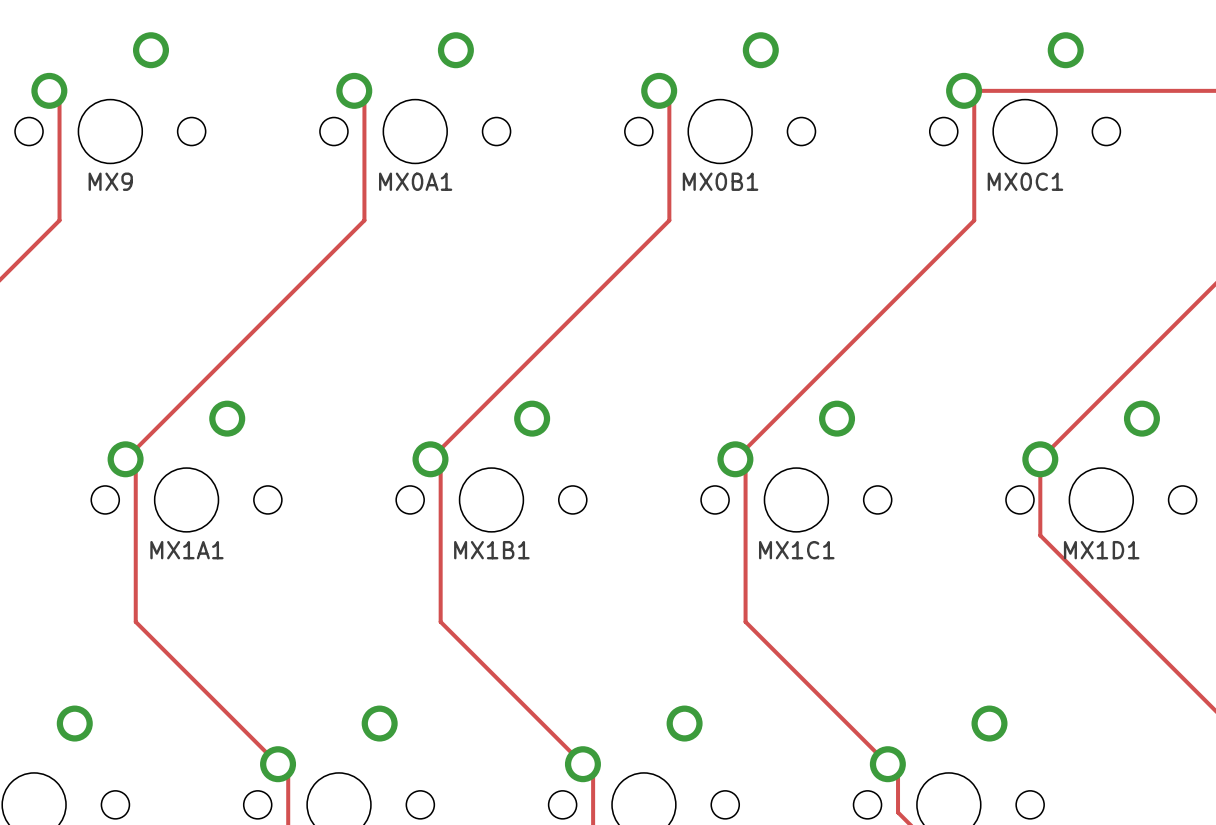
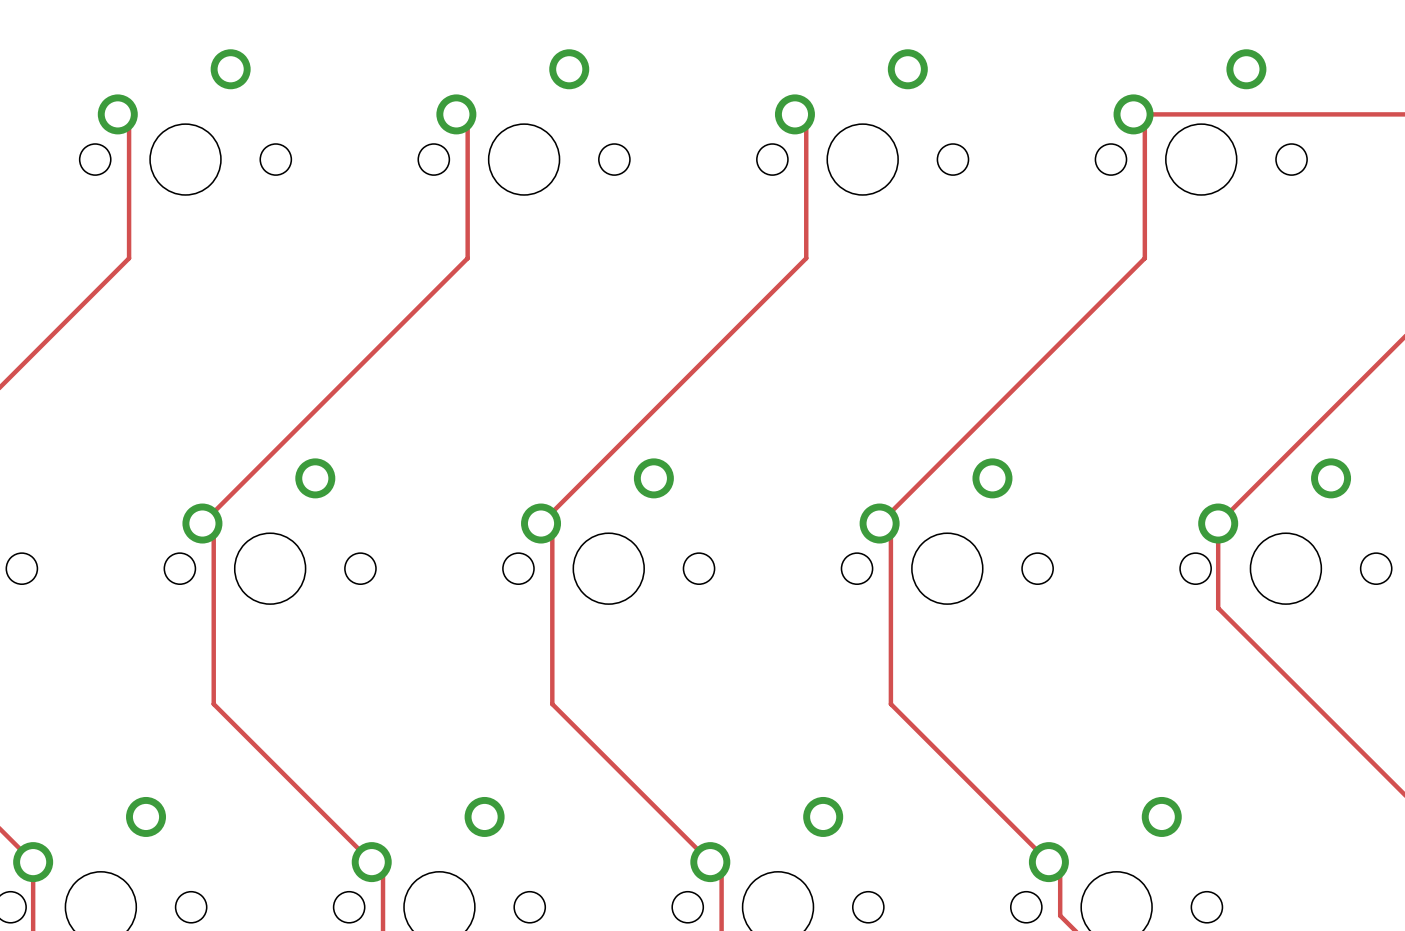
MX9 name: MX9 (110, 181) -> none
MX0A1 name: MX0A1 (415, 181) -> none
MX0B1 name: MX0B1 (720, 181) -> none
MX0C1 name: MX0C1 (1025, 181) -> none
MX1A1 name: MX1A1 (186, 550) -> none
MX1B1 name: MX1B1 (491, 550) -> none
MX1C1 name: MX1C1 (796, 550) -> none
MX1D1 name: MX1D1 (1101, 550) -> none

